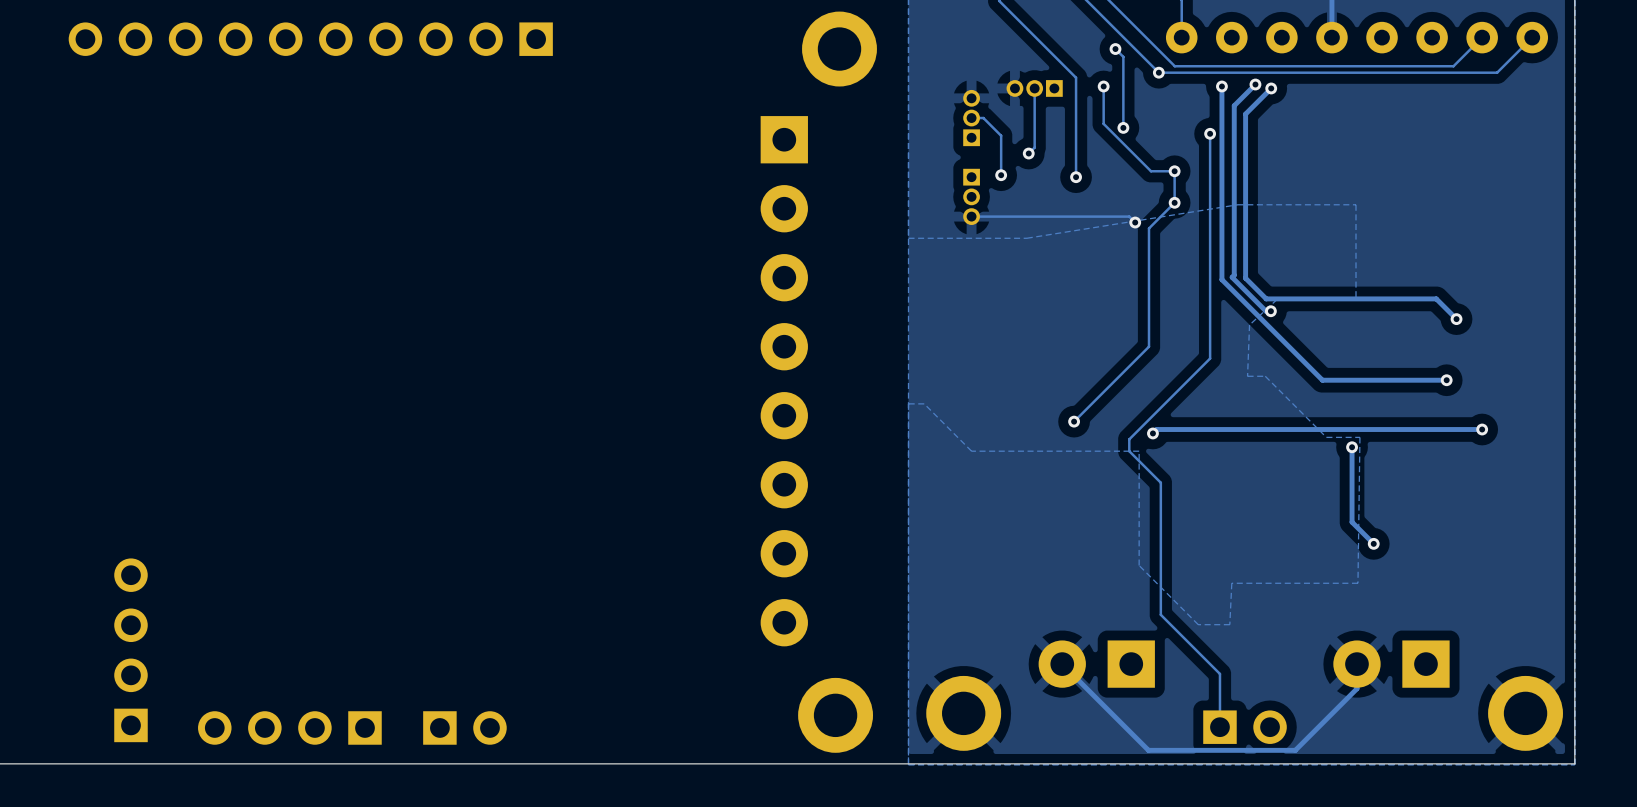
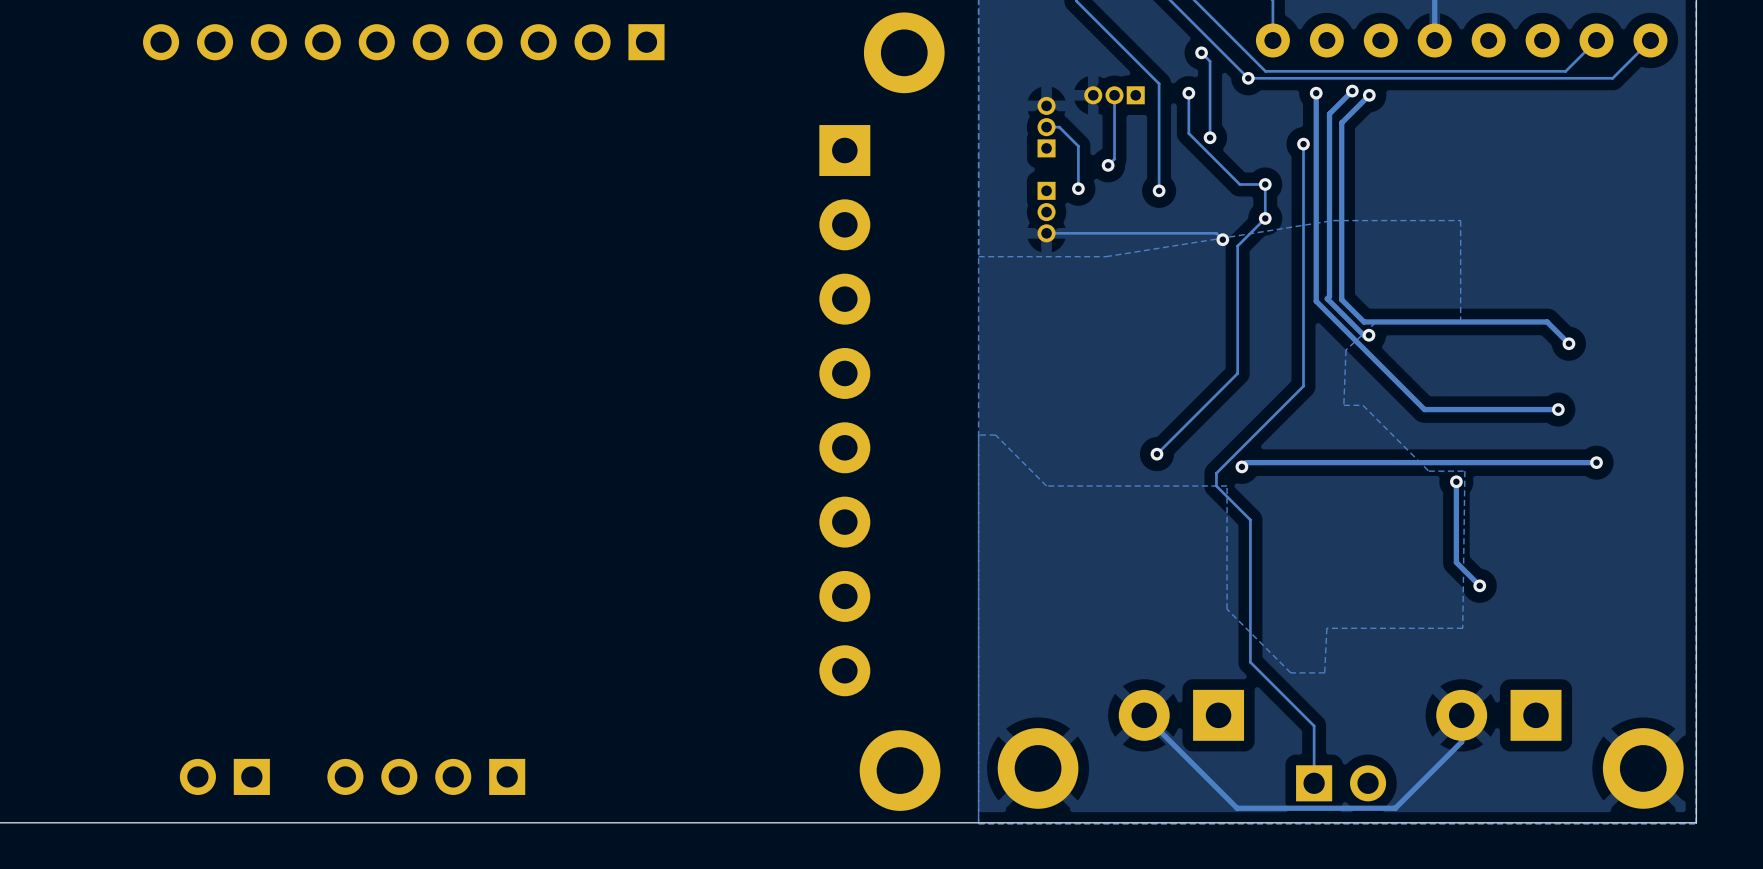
part position: (310, 39) -> (403, 42)
part: (130, 650) -> none
part position: (289, 727) -> (426, 776)
part rotation: 0° (464, 727) -> 180° (224, 776)
part position: (464, 727) -> (224, 776)

